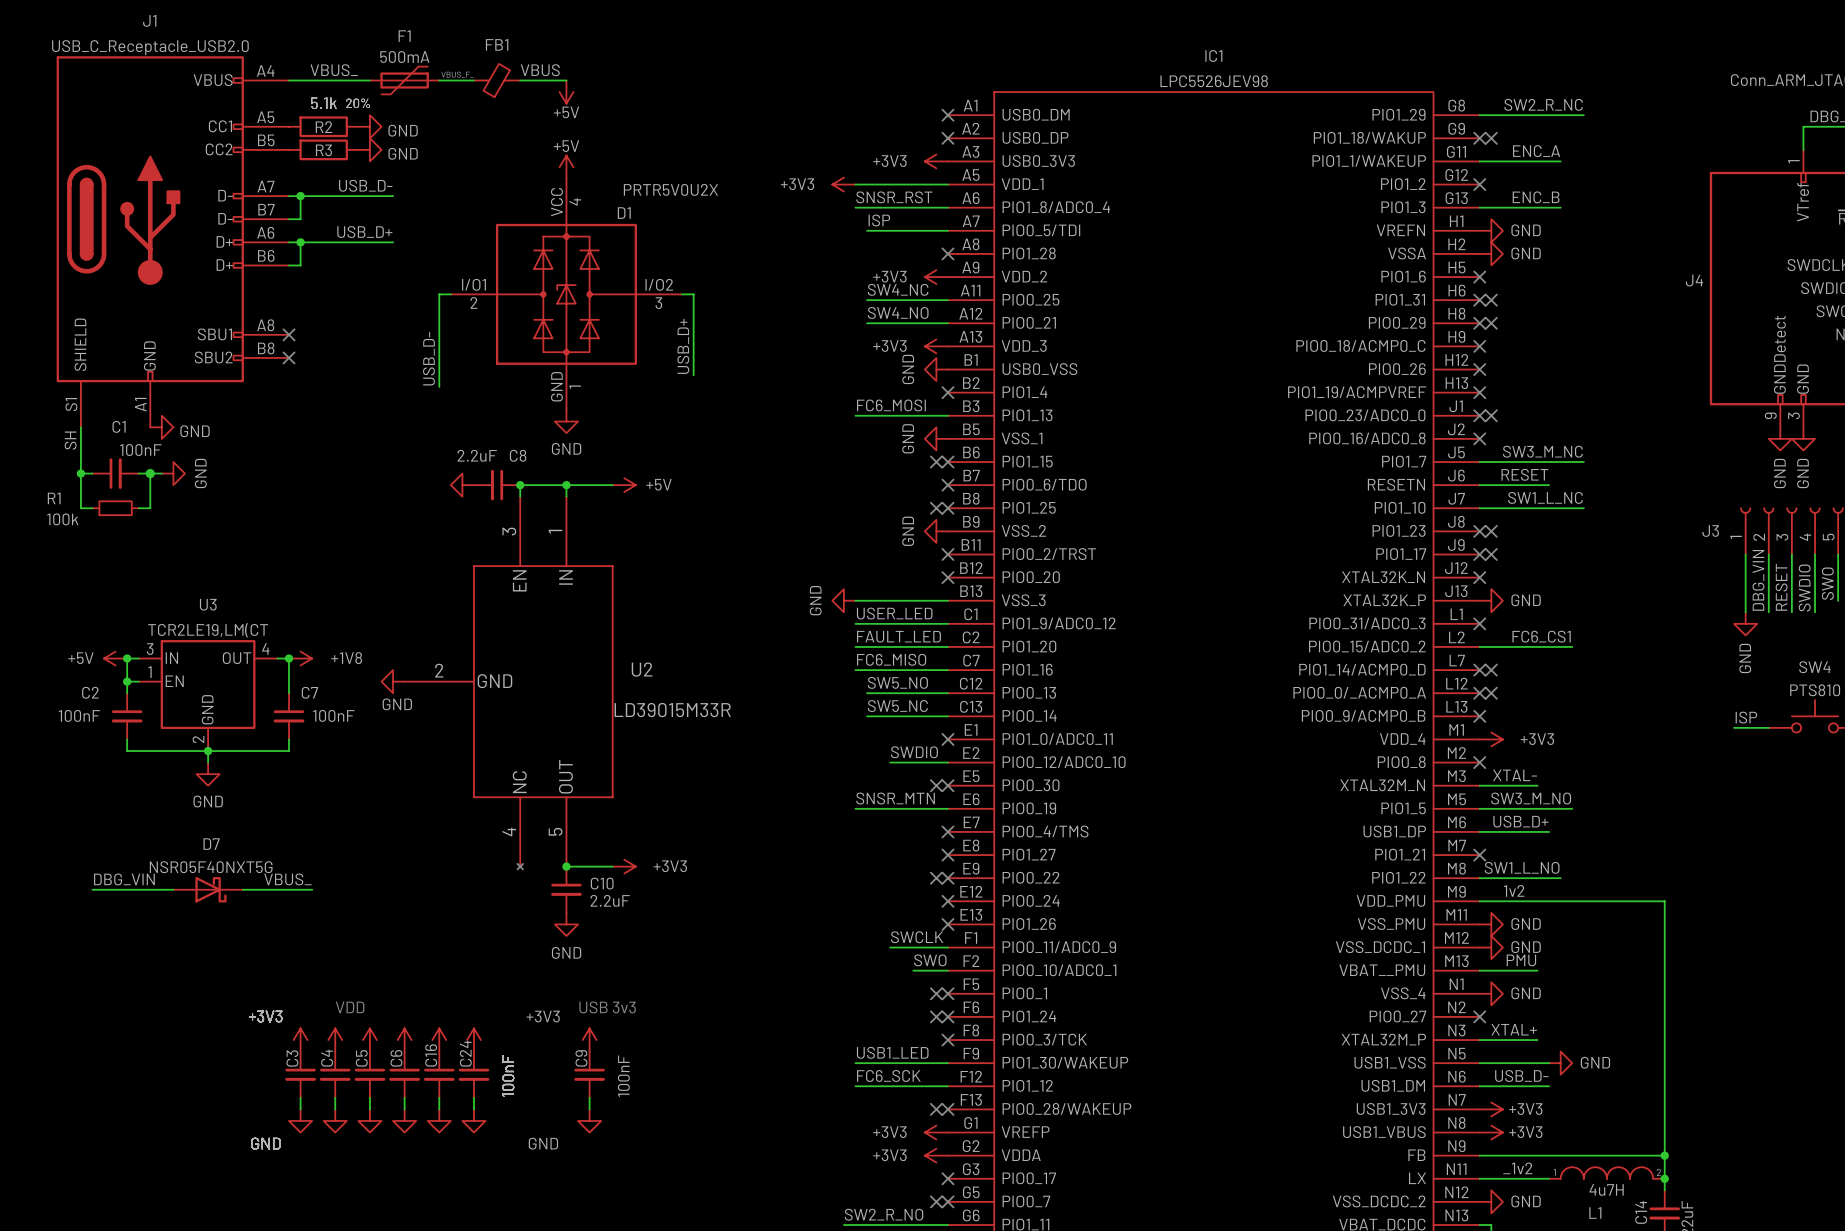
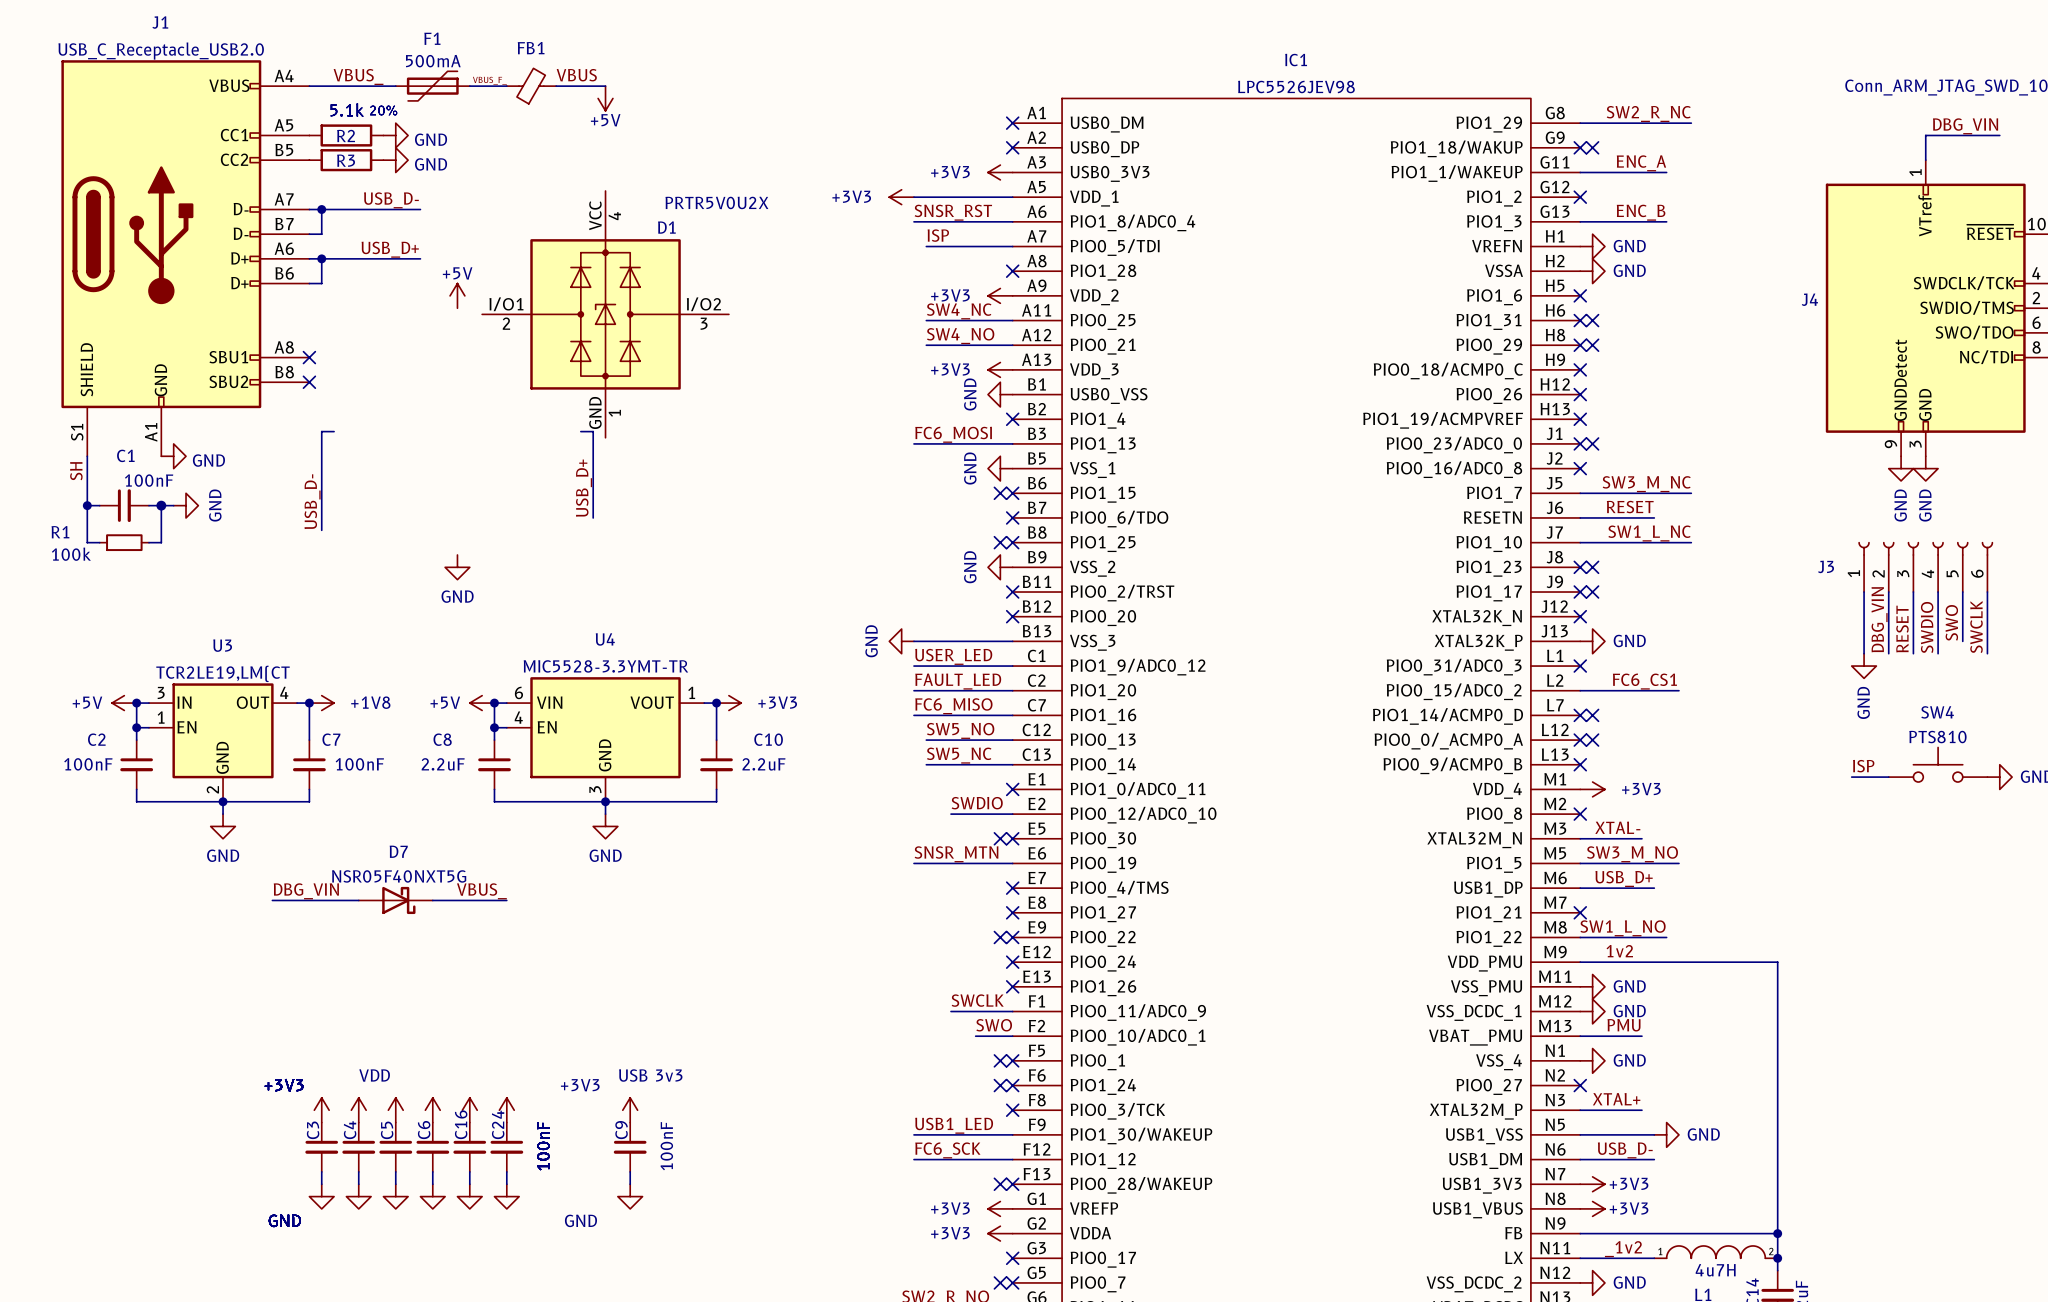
power symbol: +5V (566, 167) -> none
power symbol: none -> +5V (457, 295)
wire: (450, 294) (439, 294) (439, 386) -> (334, 431) (321, 431) (321, 530)
wire: (682, 294) (693, 294) (693, 375) -> (580, 431) (593, 431) (593, 517)
label position: USB_D+ (683, 346) -> USB_D+ (584, 488)
label position: USB_D- (428, 358) -> USB_D- (312, 501)
power symbol: GND (566, 421) -> none
power symbol: (462, 485) -> none
C8 rotation: 0° (497, 485) -> 90° counterclockwise (494, 764)
C8 position: (497, 485) -> (494, 764)
junction: (520, 485) -> none
wire: (566, 485) (566, 496) -> none
junction: (566, 485) -> none
wire: (612, 485) (520, 485) (520, 496) -> none
power symbol: +5V (624, 485) -> none
power symbol: none -> GND (457, 567)
power symbol: none -> +5V (482, 703)
junction: none -> (494, 703)
wire: none -> (506, 703) (494, 703) (494, 740)
wire: none -> (704, 703) (716, 703) (716, 740)
junction: none -> (716, 703)
power symbol: GND (393, 681) -> none
junction: none -> (494, 727)
U2: LD39015M33R (508, 683) -> none
U4: none -> MIC5528-3.3YMT-TR (605, 739)
wire: none -> (494, 789) (494, 801) (716, 801) (716, 789)
wire: none -> (605, 801) (605, 814)
junction: none -> (605, 801)
power symbol: none -> GND (605, 826)
wire: (566, 866) (612, 866) -> none
junction: (566, 866) -> none
power symbol position: +3V3 (624, 866) -> +3V3 (728, 703)
label position: DBG_VIN (124, 879) -> DBG_VIN (306, 891)
label position: VBUS_ (287, 879) -> VBUS_ (481, 891)
C10 name position: C10 (602, 883) -> C10 (768, 739)
wire: (92, 889) (173, 889) -> (272, 900) (358, 900)
D7 position: (208, 889) -> (395, 900)
wire: (242, 889) (312, 889) -> (432, 900) (506, 900)
C10 position: (566, 889) -> (716, 764)
C10 value position: 2.2uF (610, 900) -> 2.2uF (763, 764)
power symbol: GND (566, 924) -> none

